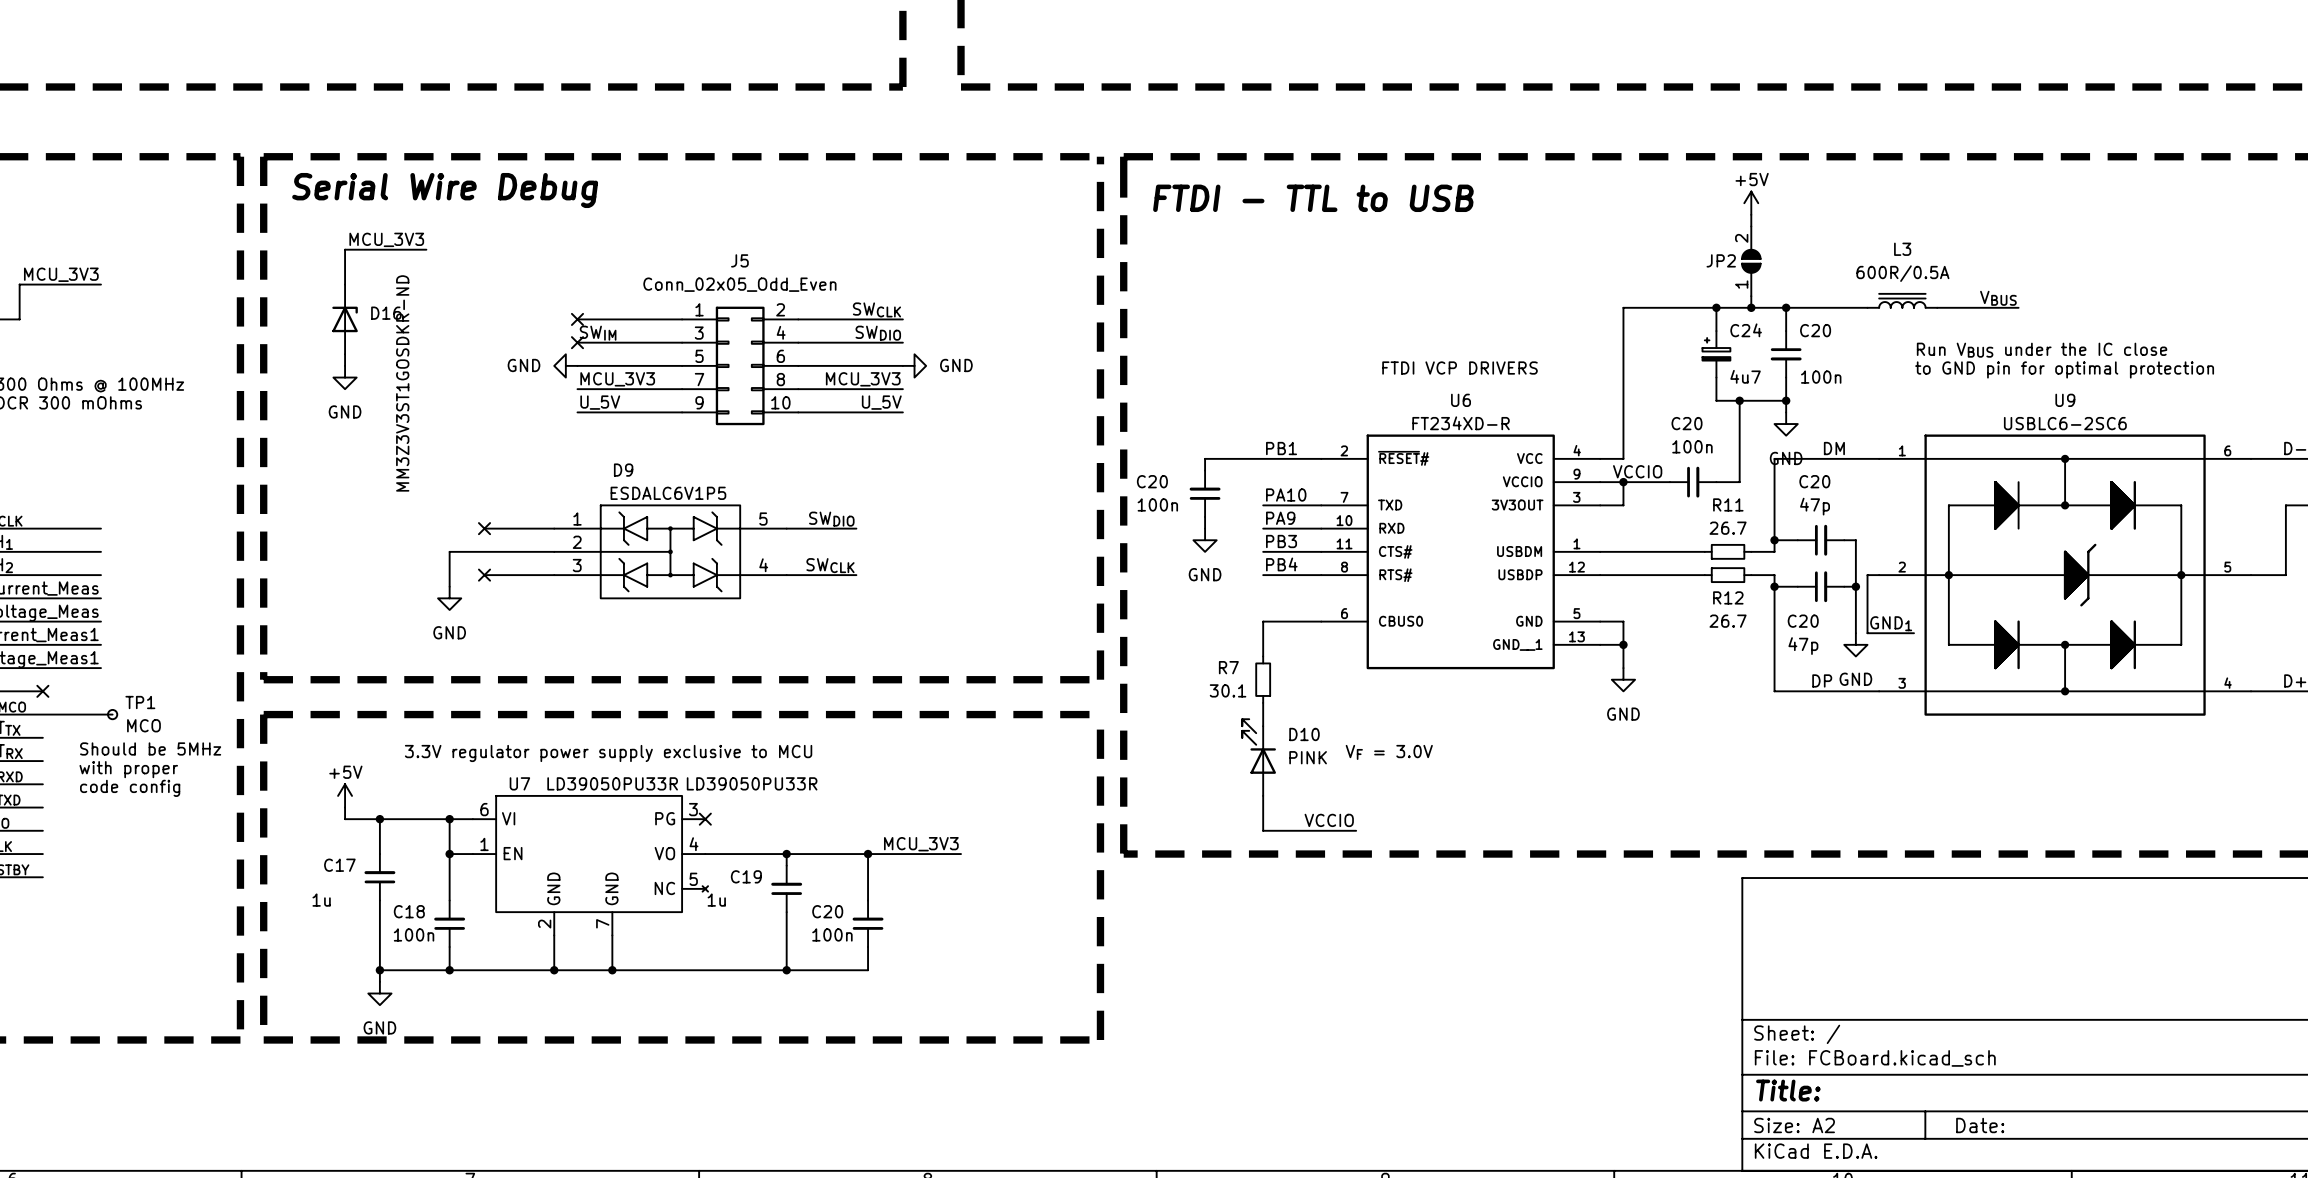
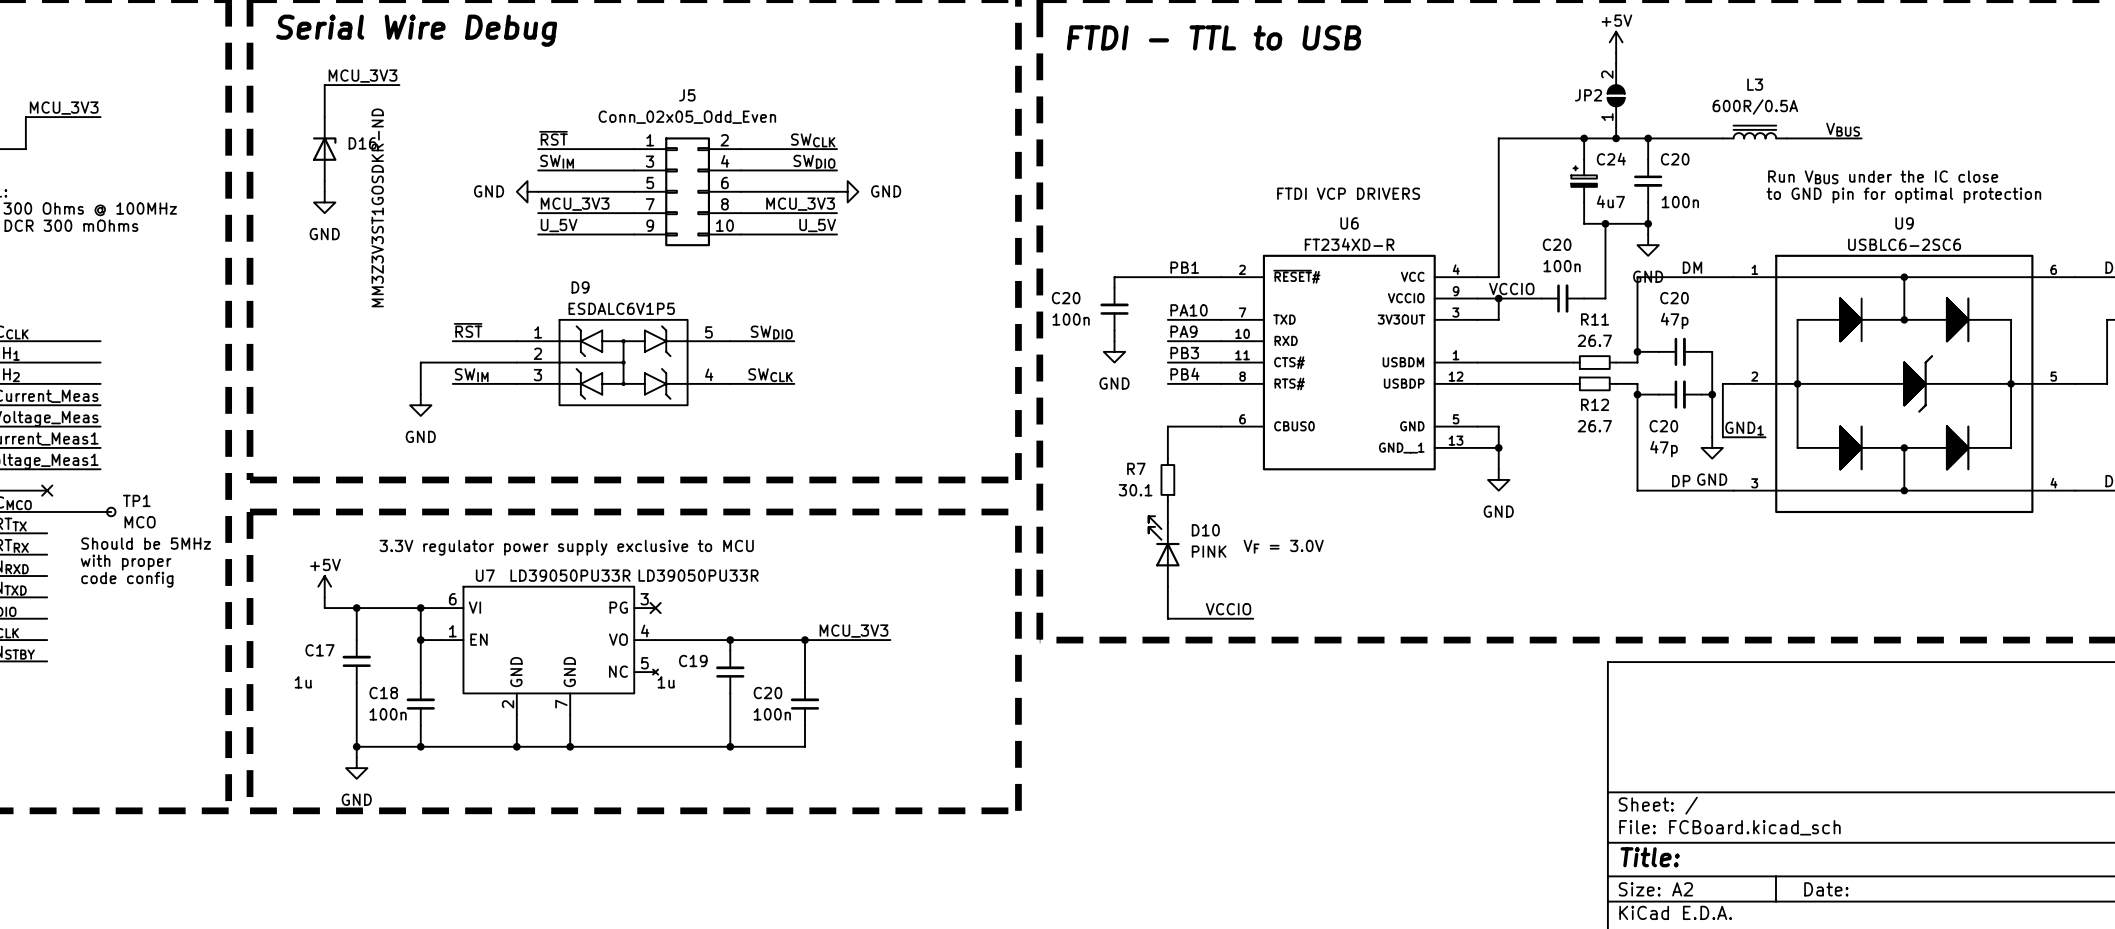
label: none -> ~{RST} (553, 138)
no-connect mark: (577, 319) -> none
no-connect mark: (577, 342) -> none
label: none -> ~{RST} (468, 330)
no-connect mark: (484, 528) -> none
label: none -> SWIM (471, 375)
no-connect mark: (484, 575) -> none

